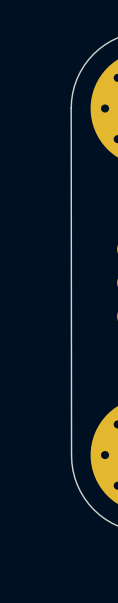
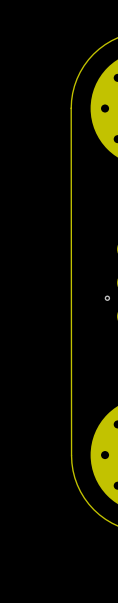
via: none -> (107, 298)

